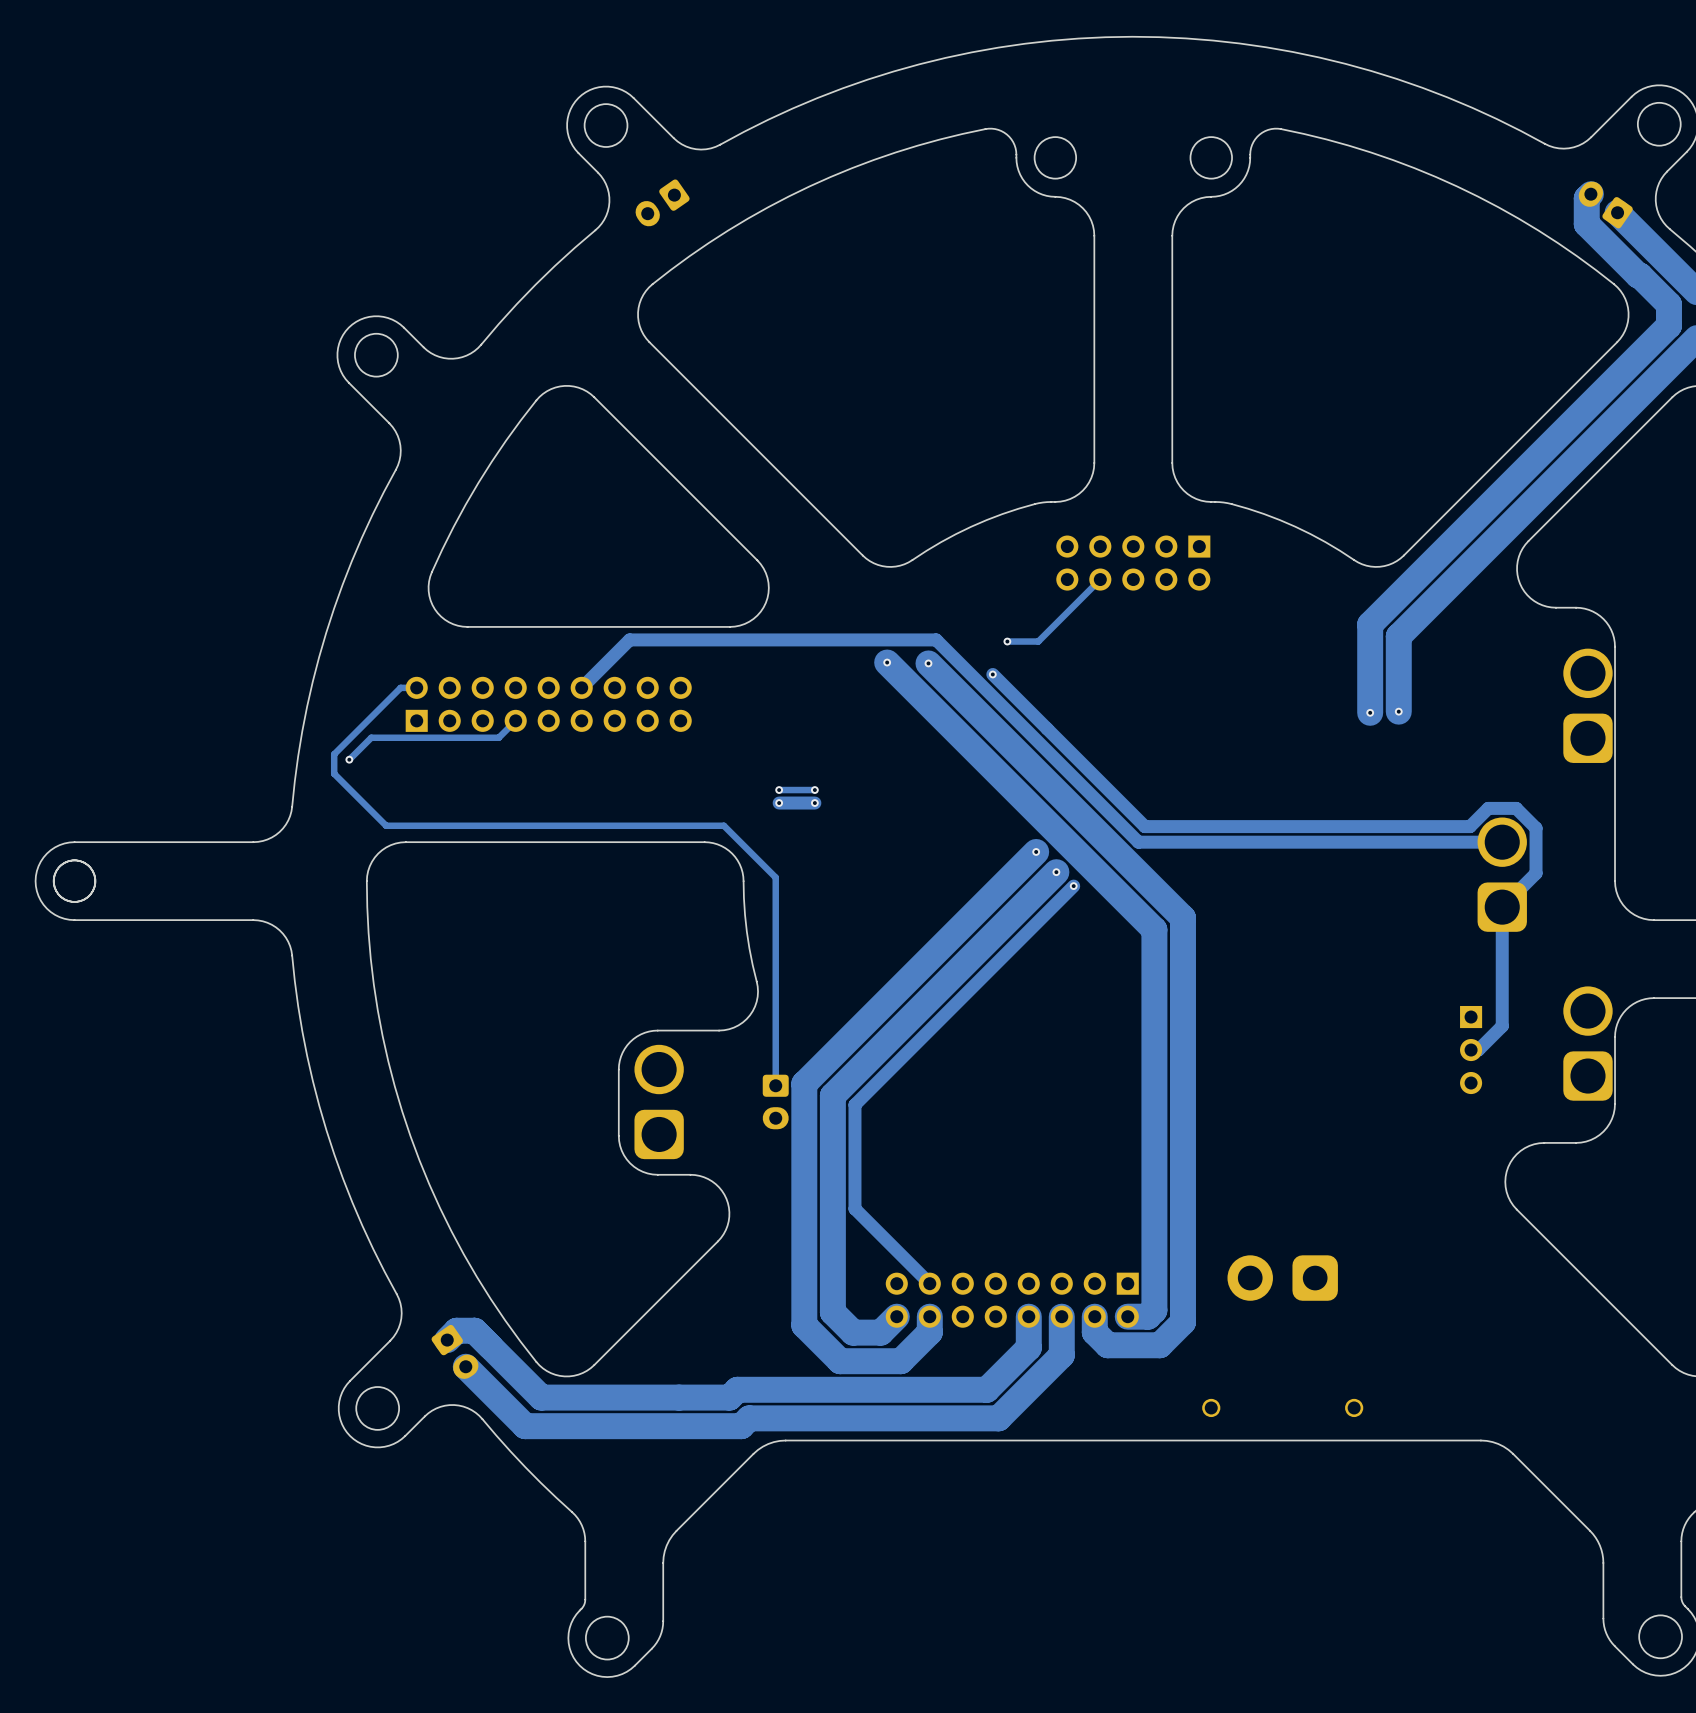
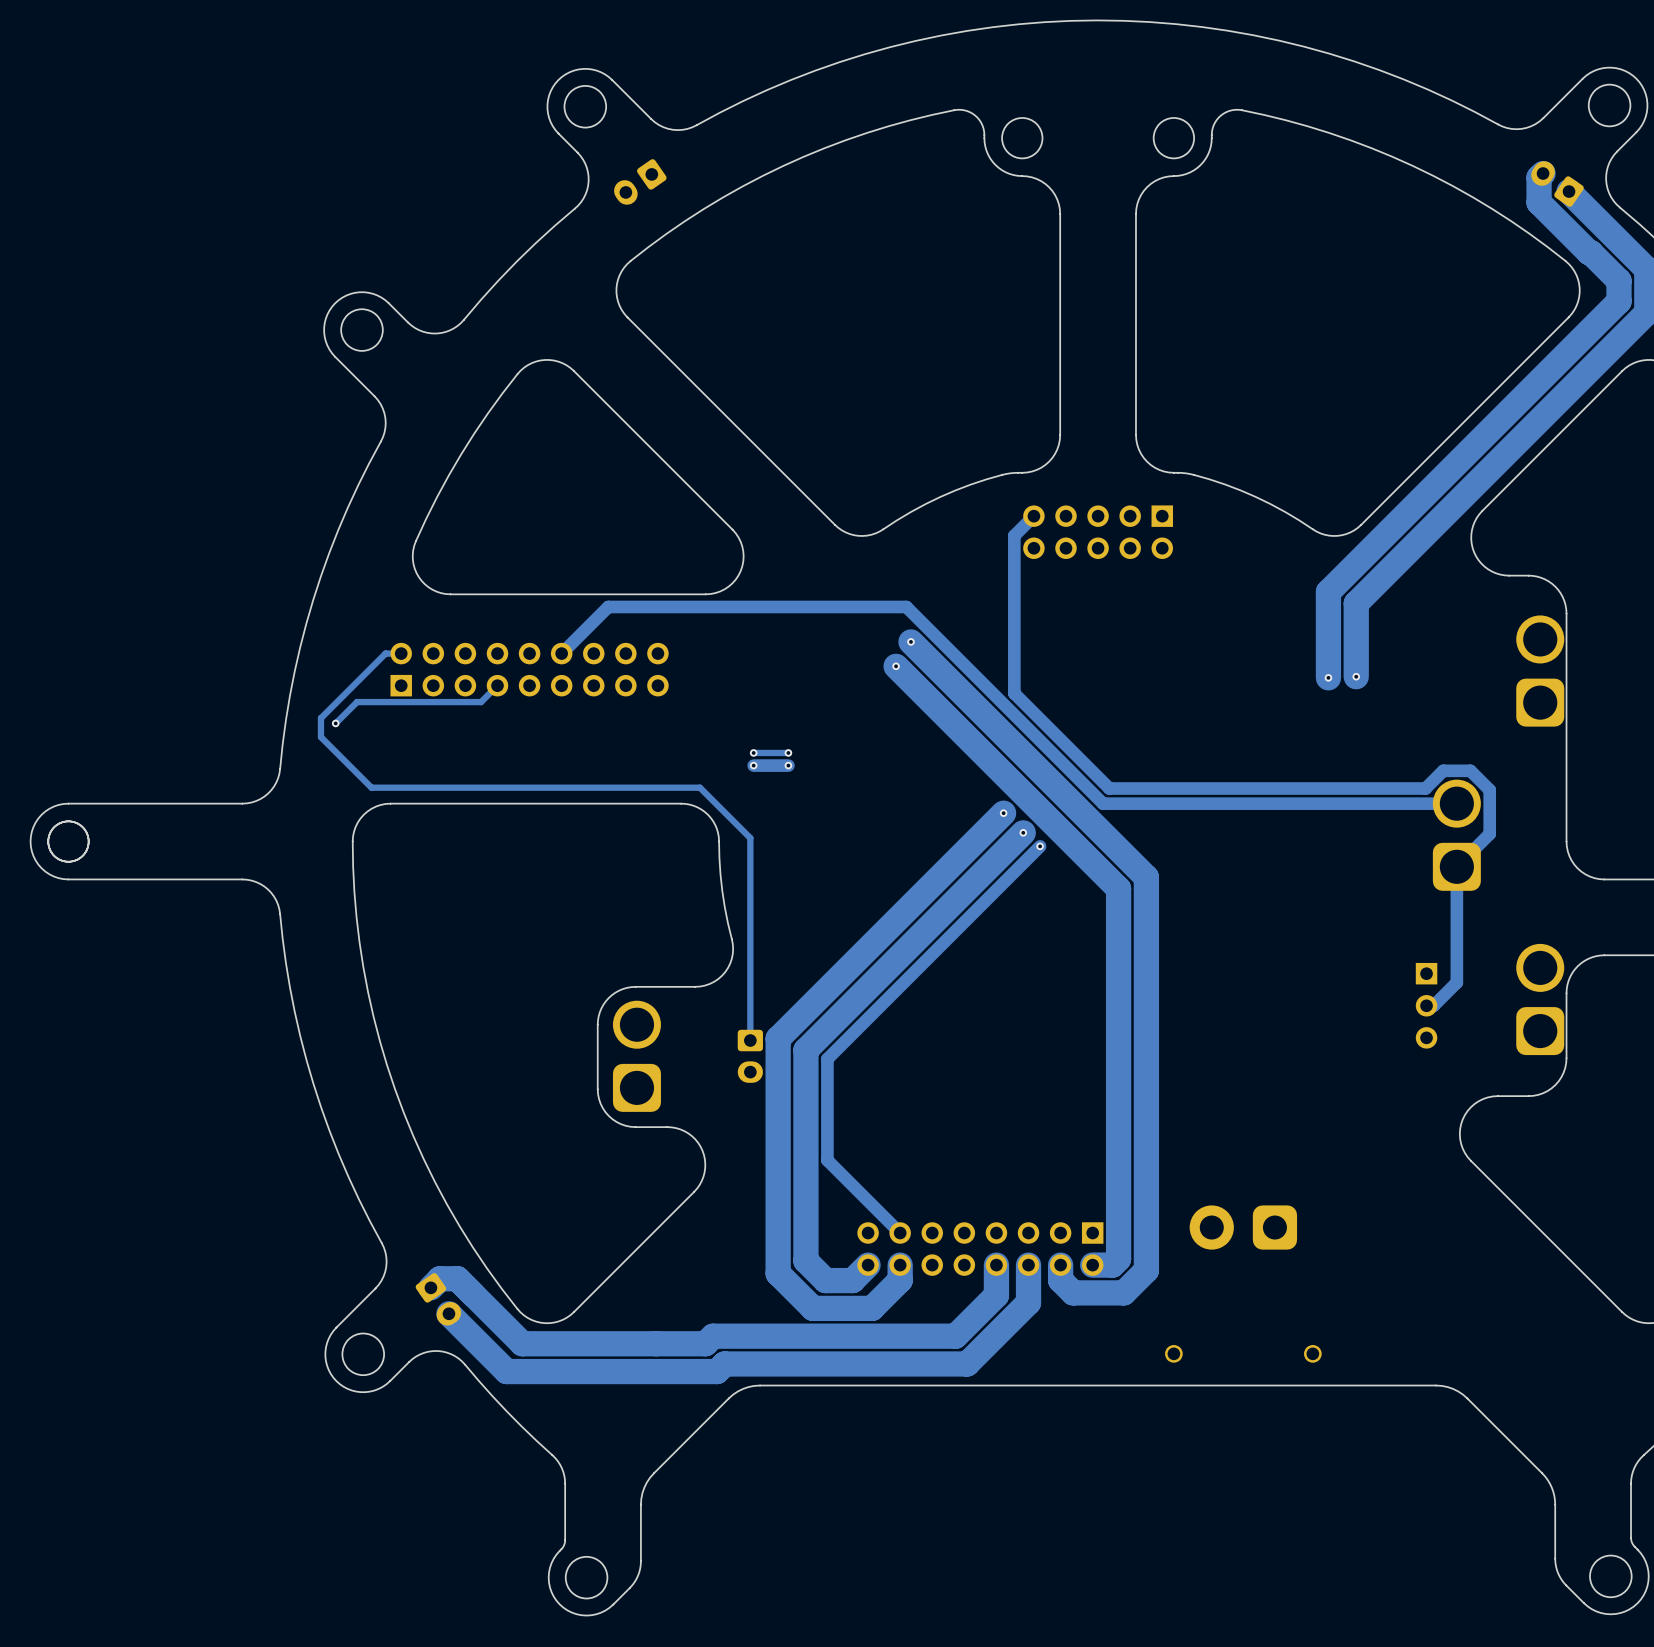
track: (1100, 579) (1038, 641) (1007, 641) -> none
via: (1007, 641) -> none
track: (887, 662) (925, 700) -> none
via: (887, 662) -> none
track: (928, 663) (940, 675) -> none
via position: (928, 663) -> (910, 641)
track: (992, 674) (1047, 728) -> (1033, 516) (1014, 535) (1014, 693)
via: (992, 674) -> none
via: none -> (896, 666)

